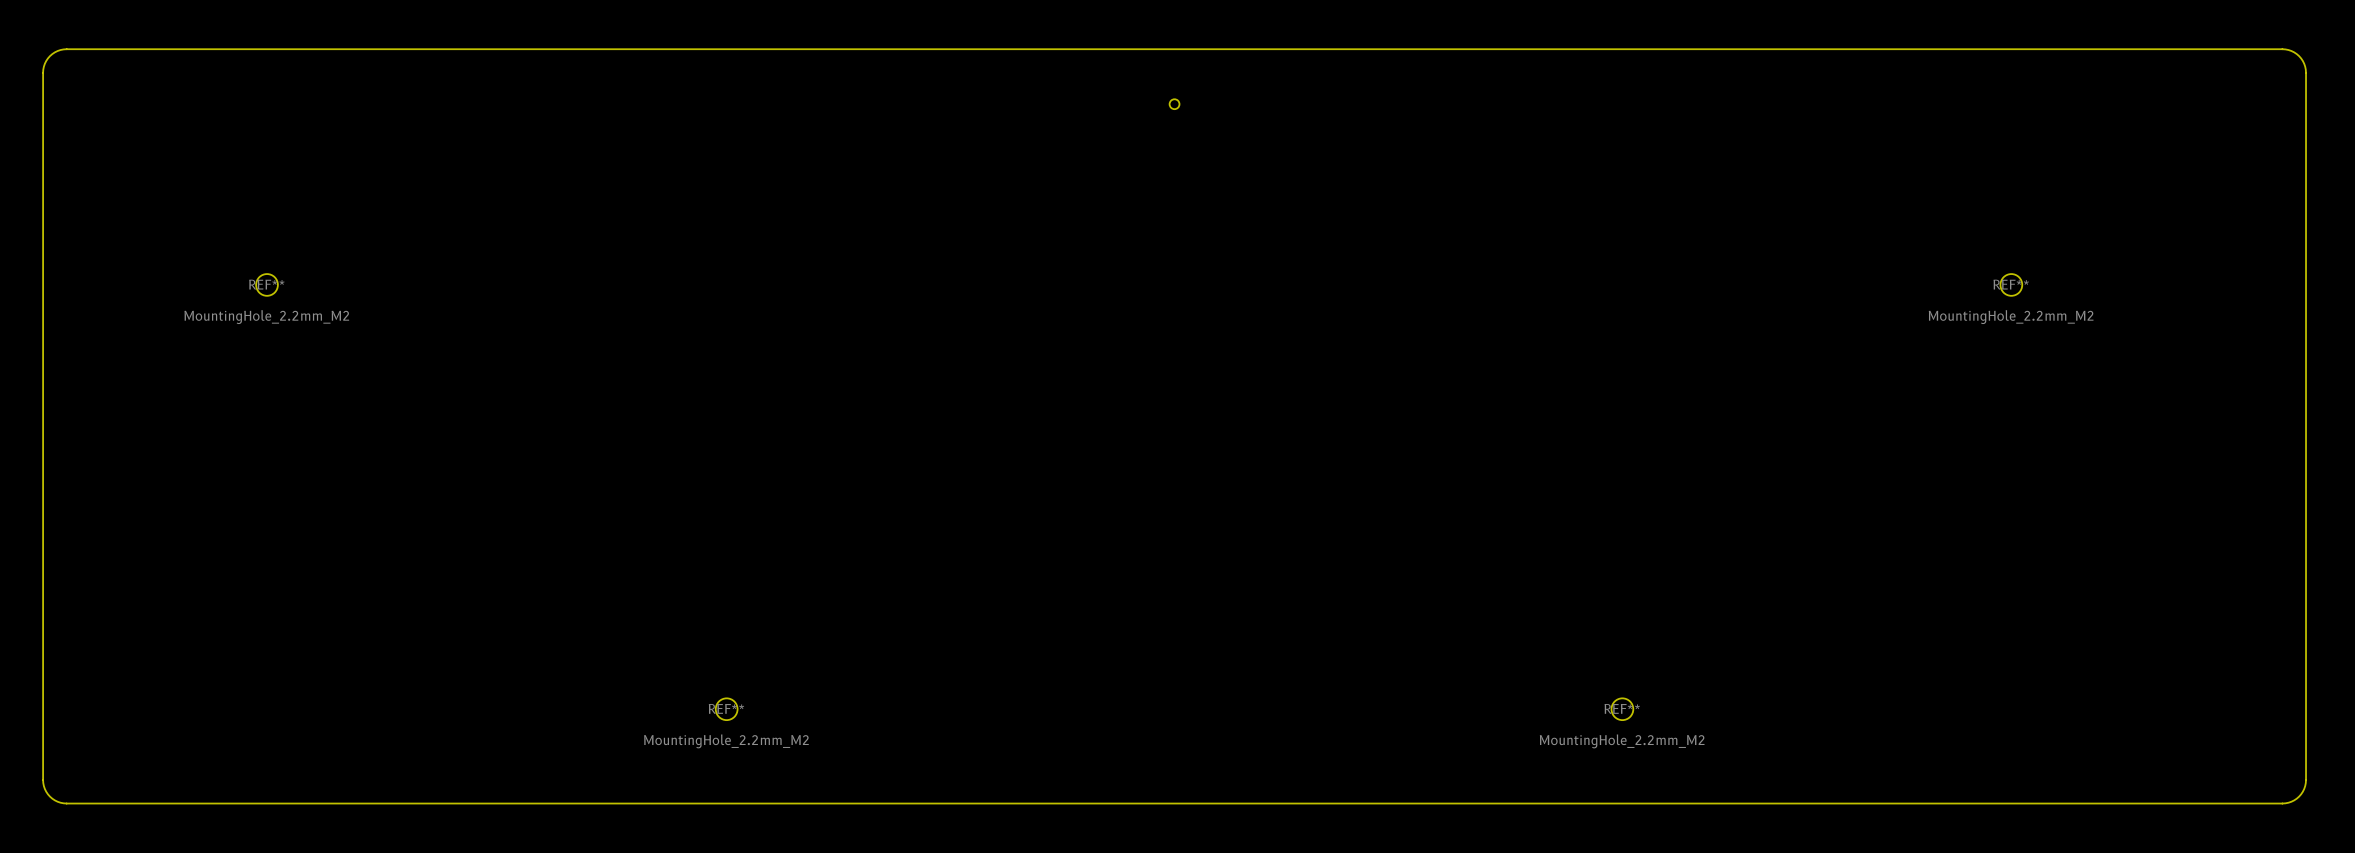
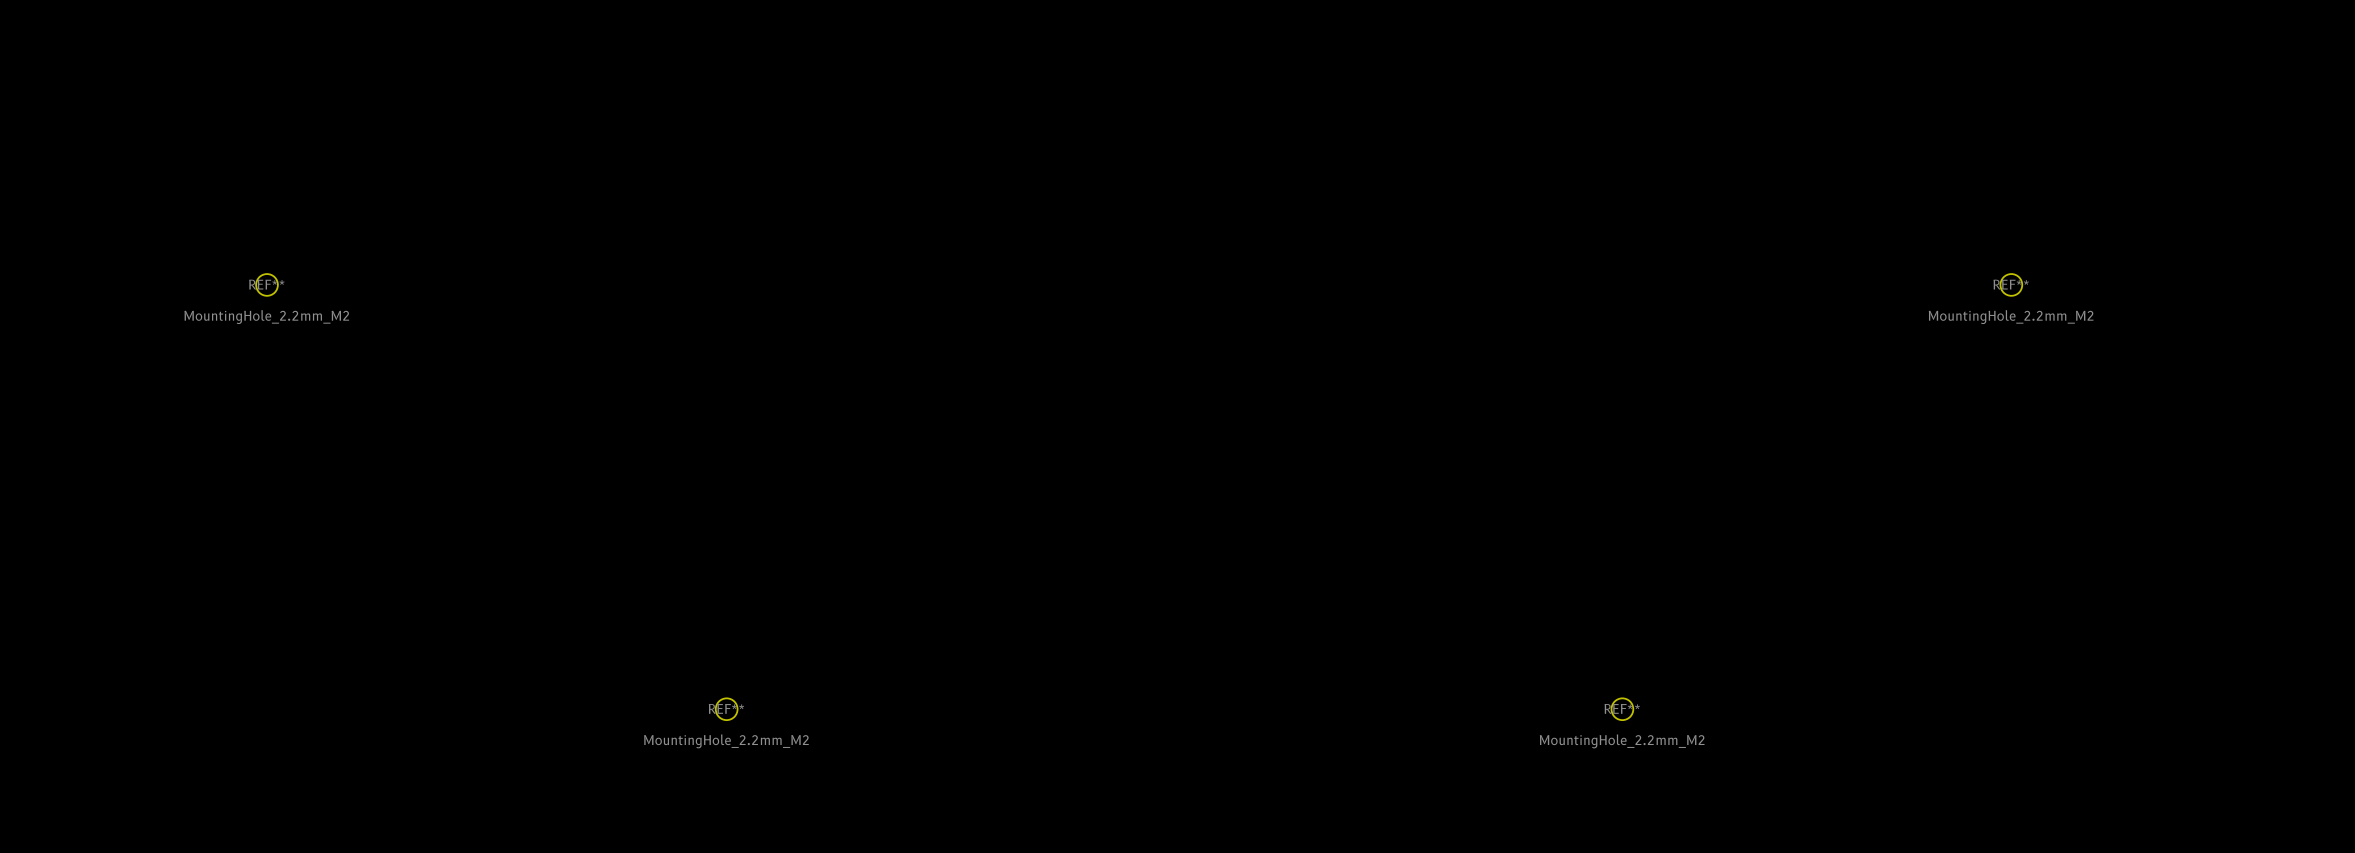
board edge: (66, 49) (2288, 50) (2301, 58) (2306, 72) (2305, 786) (2296, 798) (2282, 803) (60, 802) (47, 794) (43, 779) (43, 72) (44, 63) (49, 56) (57, 51) (66, 49) -> none
round board edge: [1169, 99, 1180, 110] -> none

